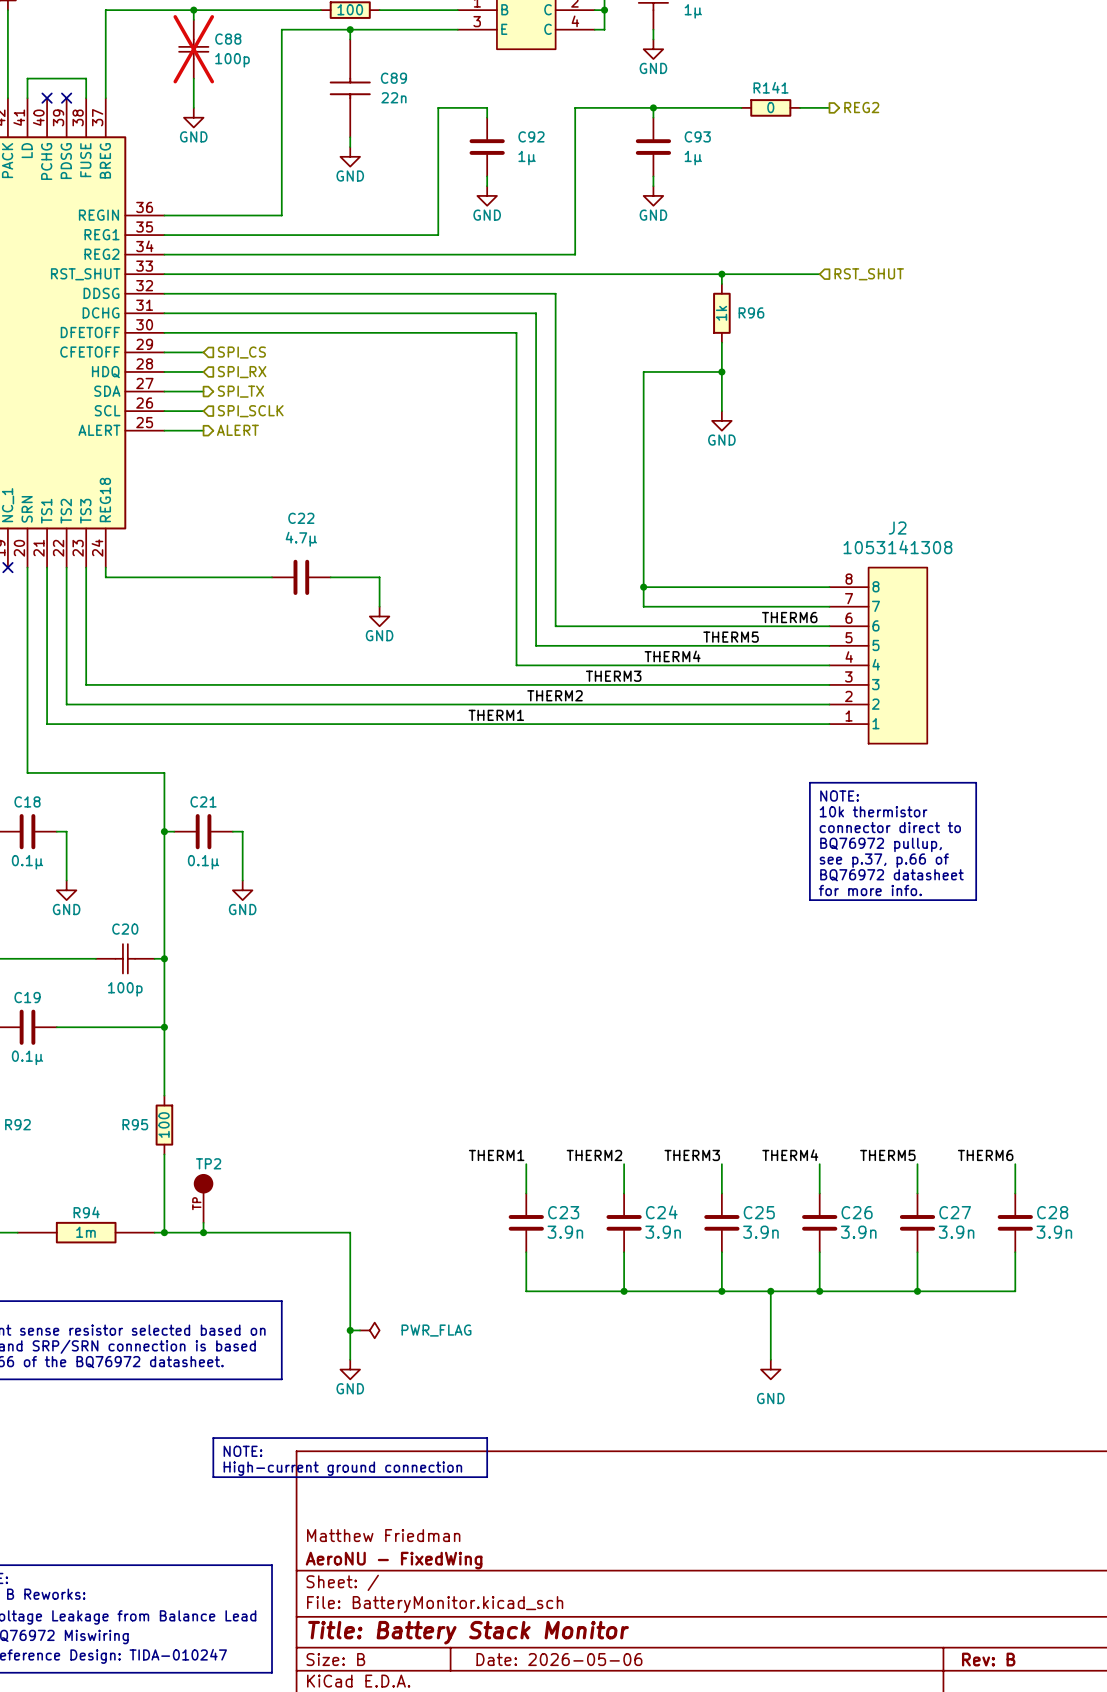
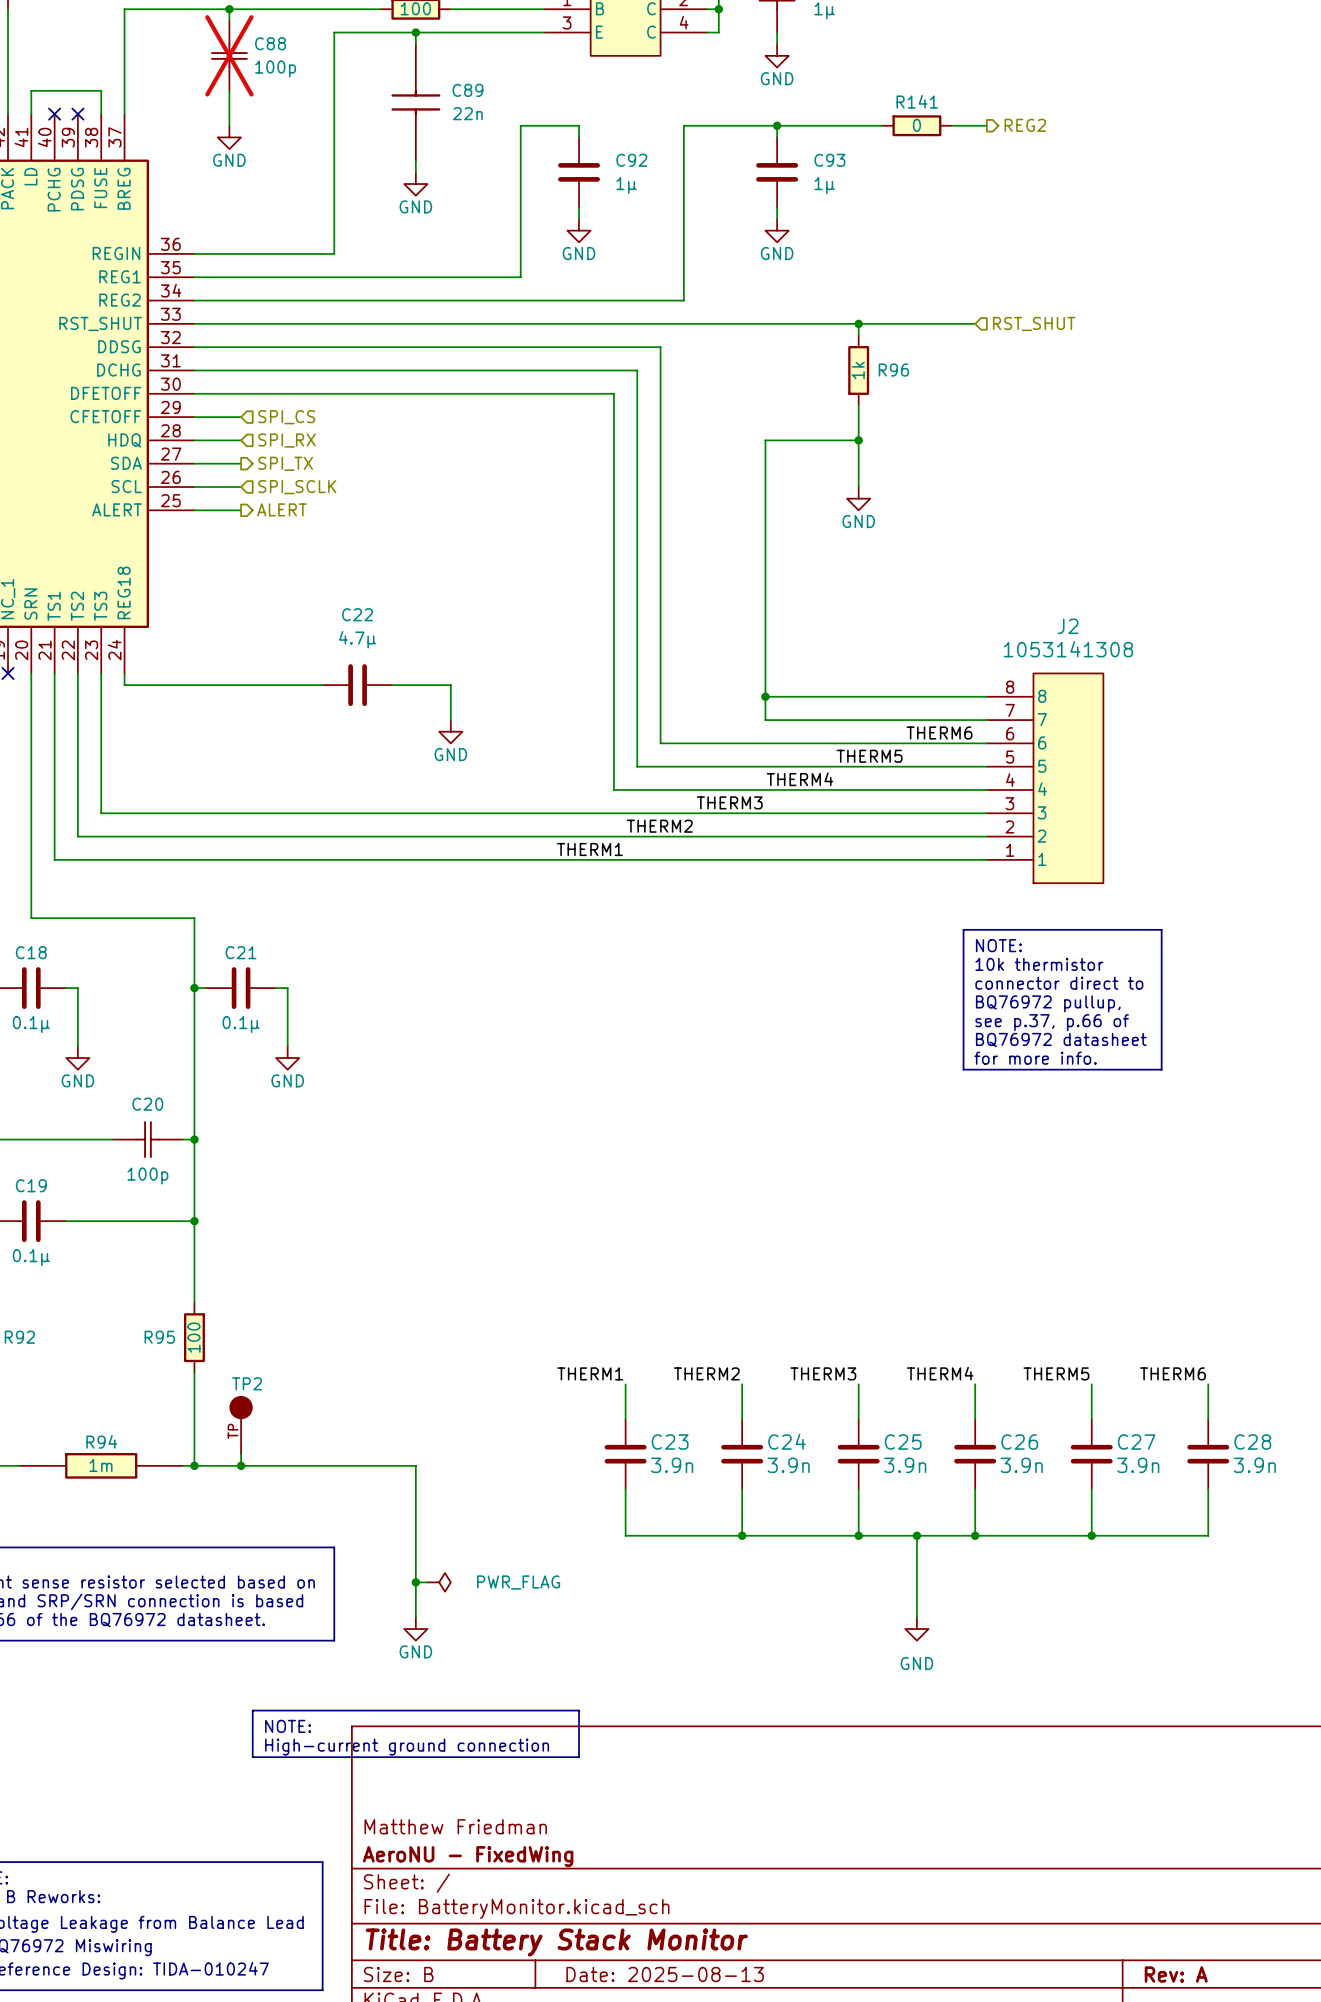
title block: Date: 2026-05-06 (559, 1659) -> Date: 2025-08-13 (665, 1974)
title block: Rev: B (988, 1659) -> Rev: A (1176, 1974)

